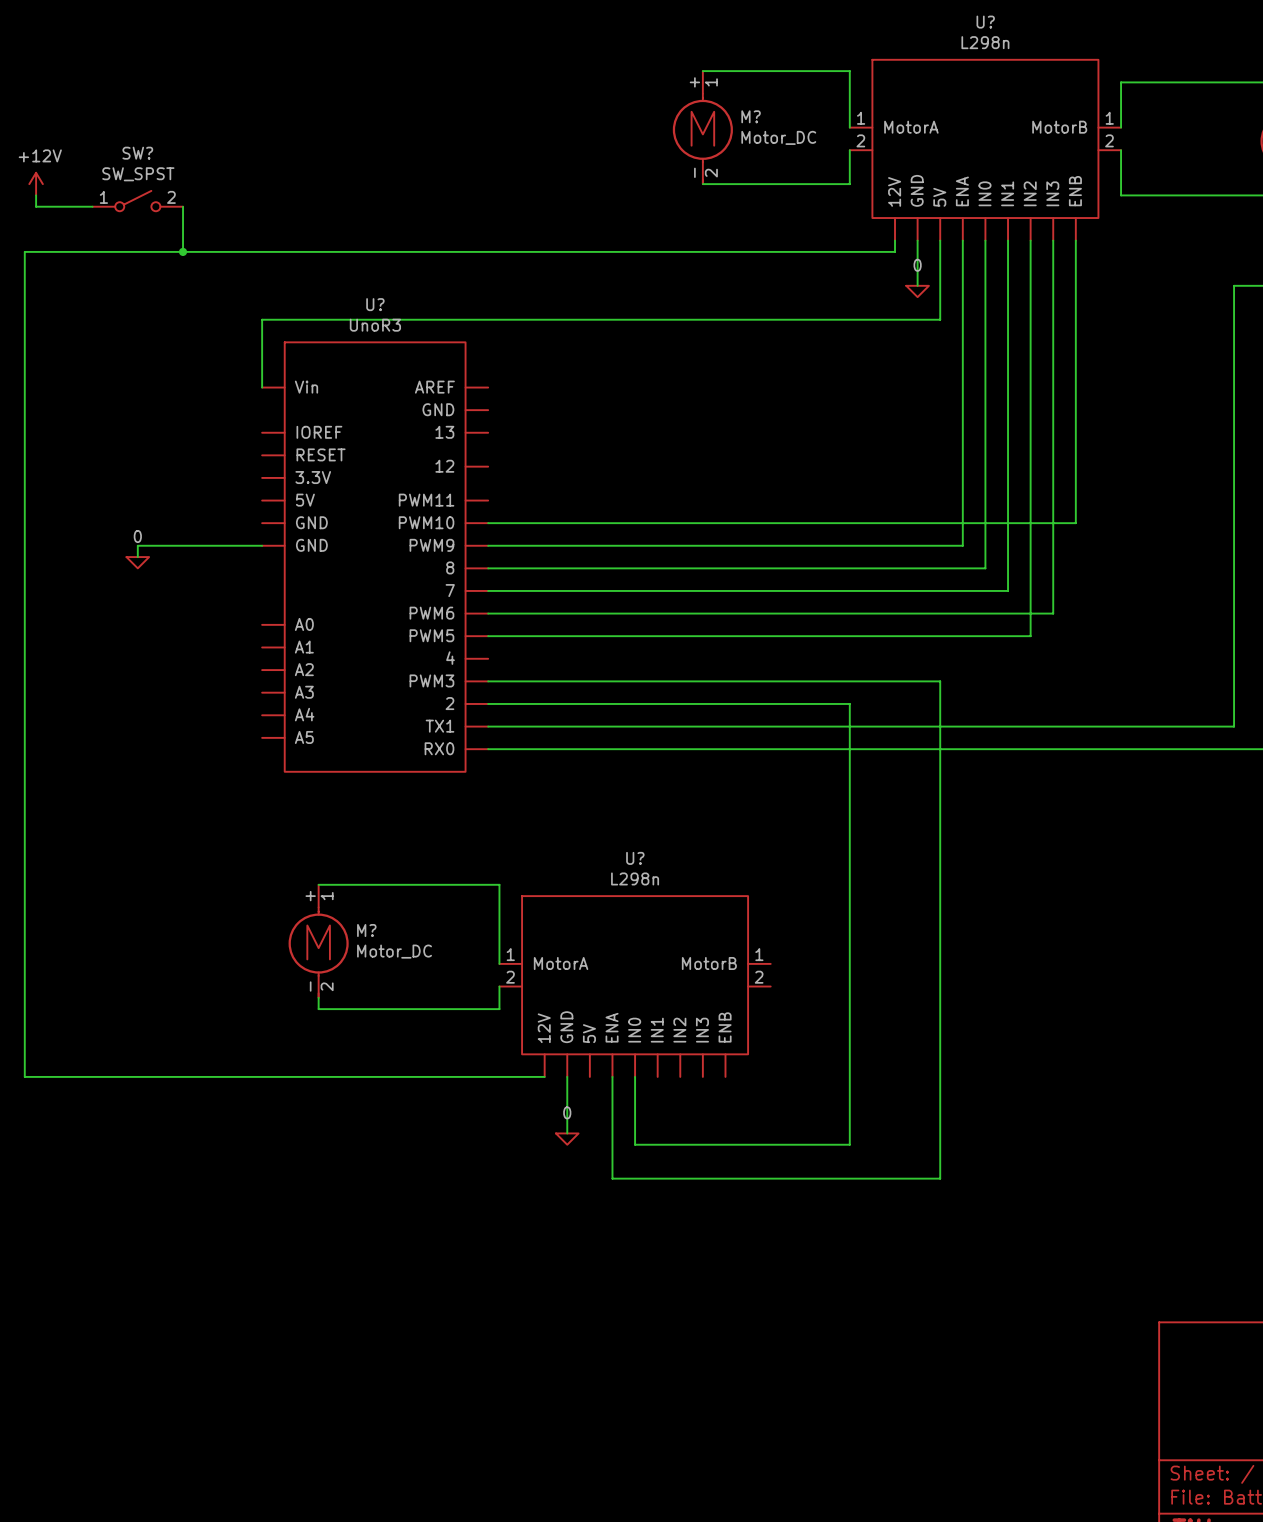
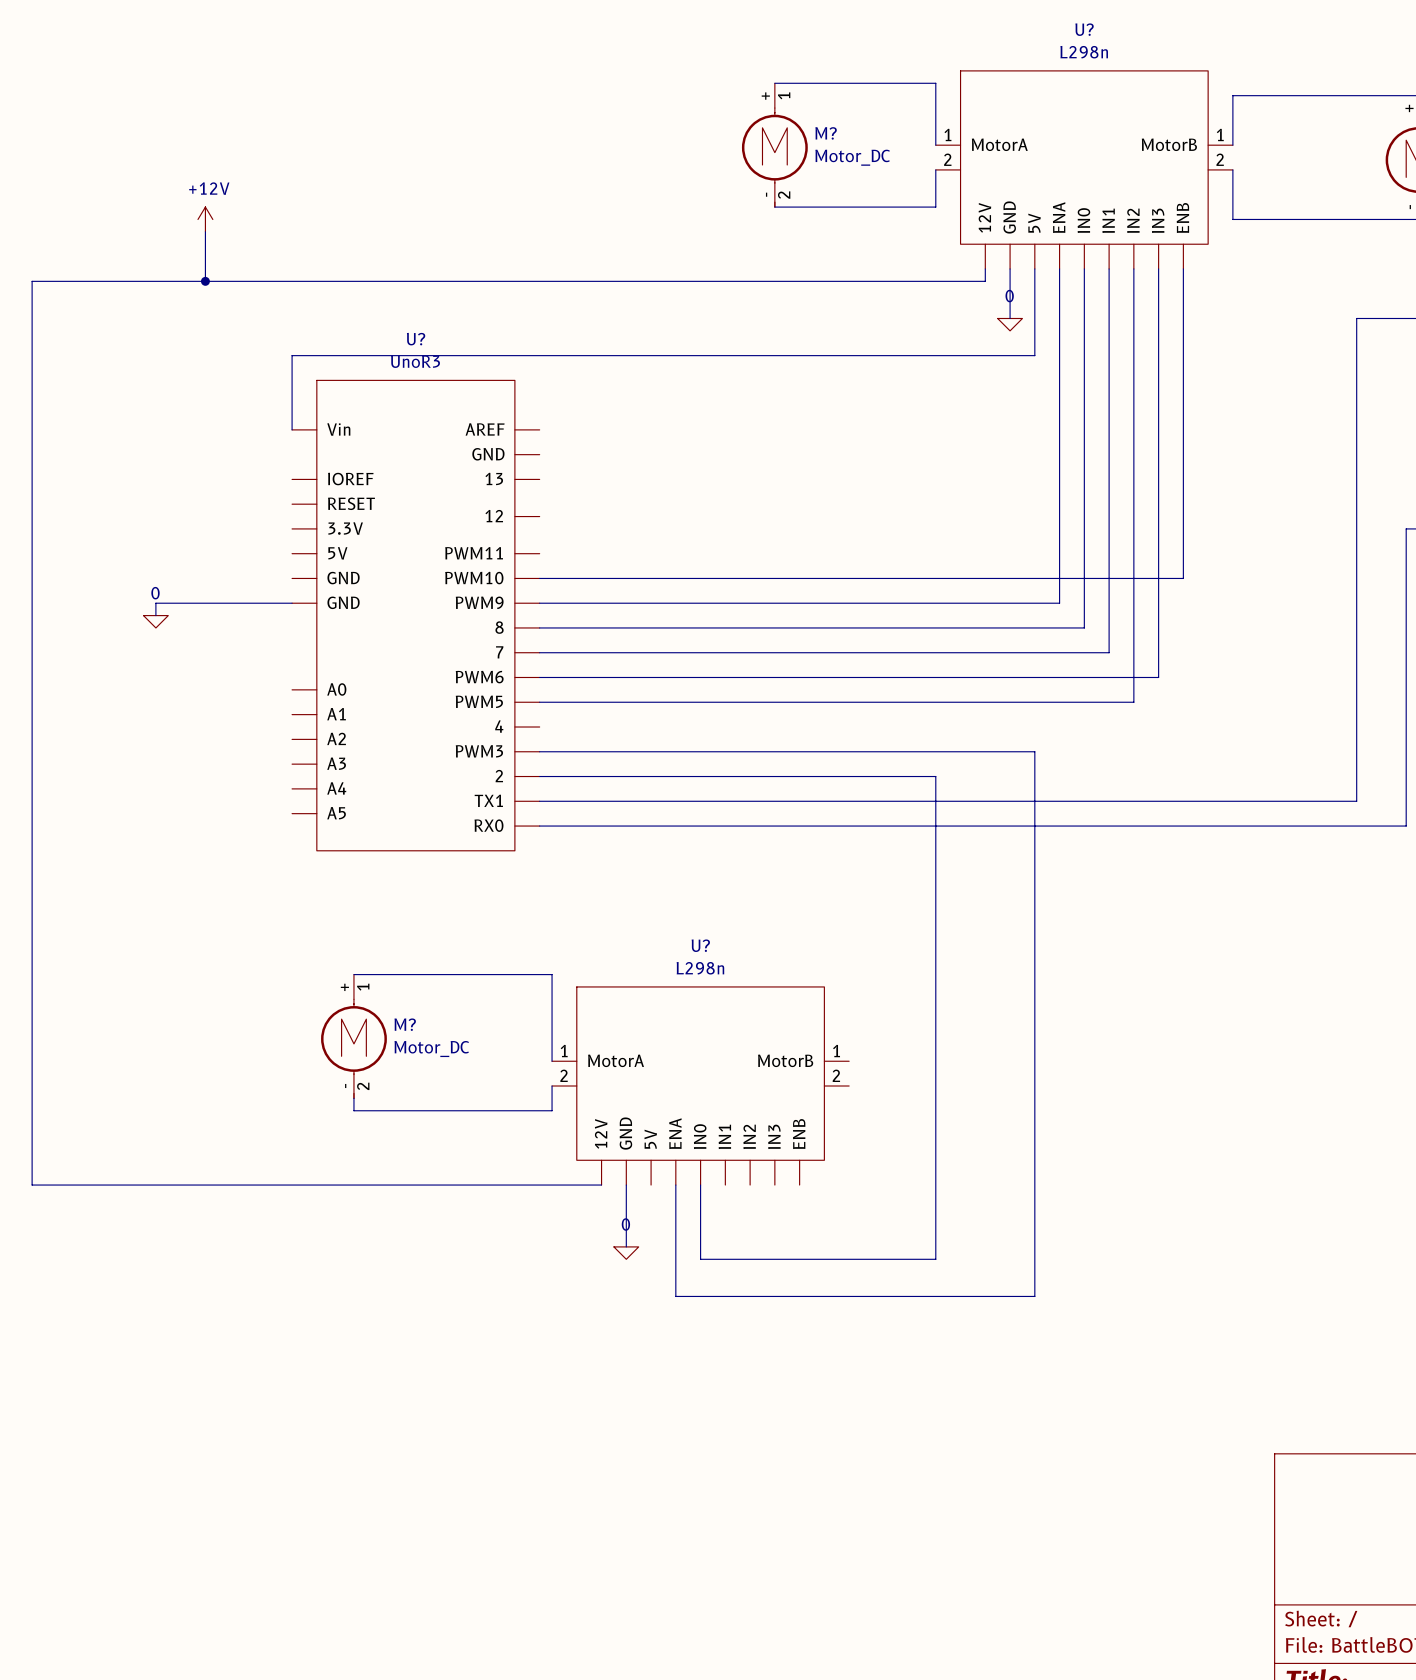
power symbol position: +12V (36, 184) -> +12V (205, 219)
wire: (36, 195) (36, 206) (92, 206) -> none
SW?: SW_SPST (137, 201) -> none

